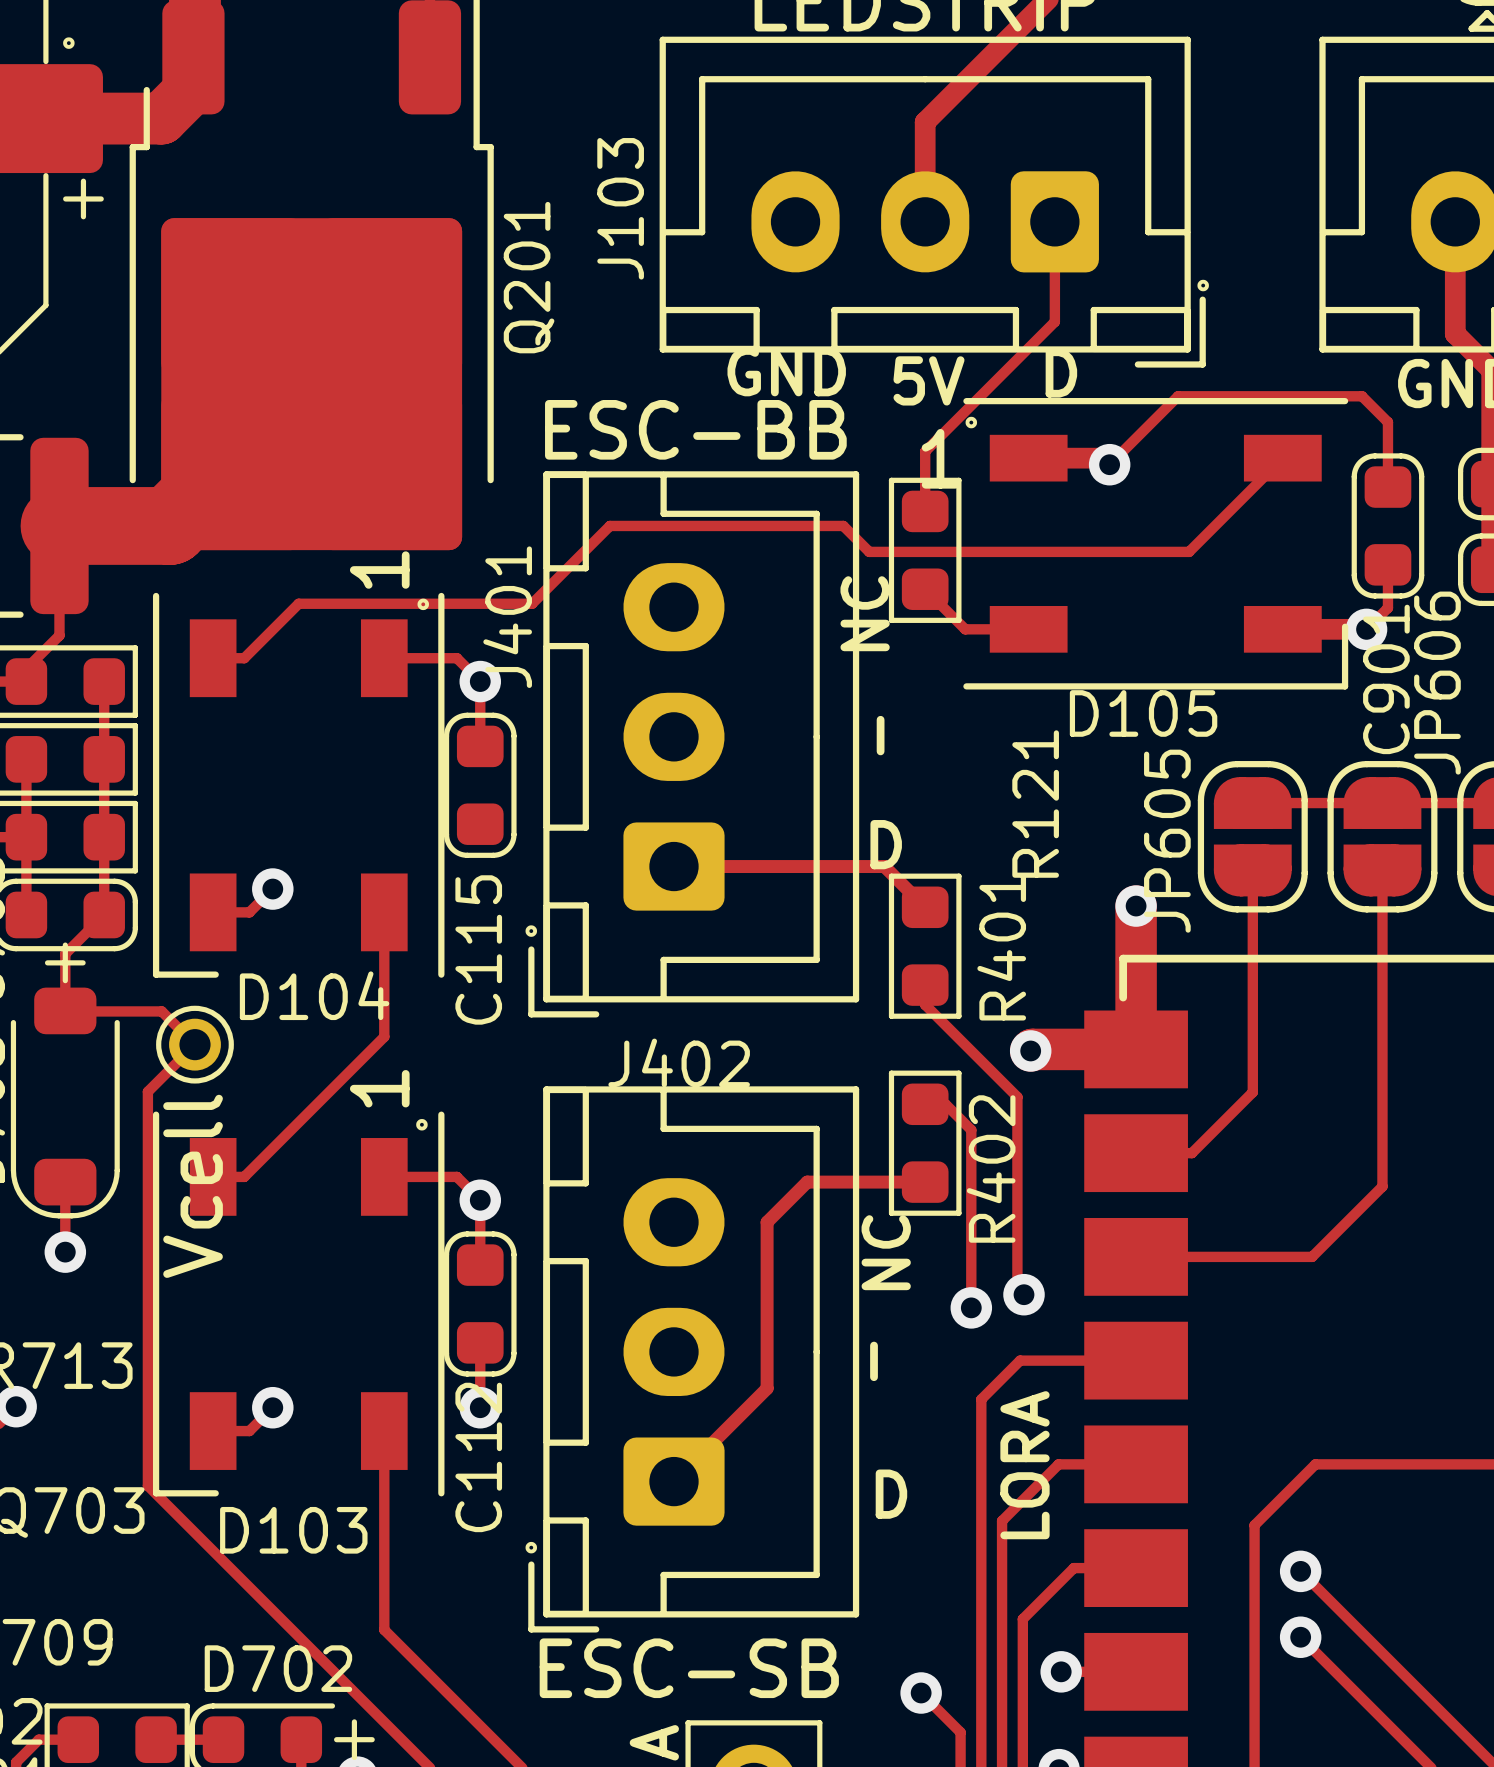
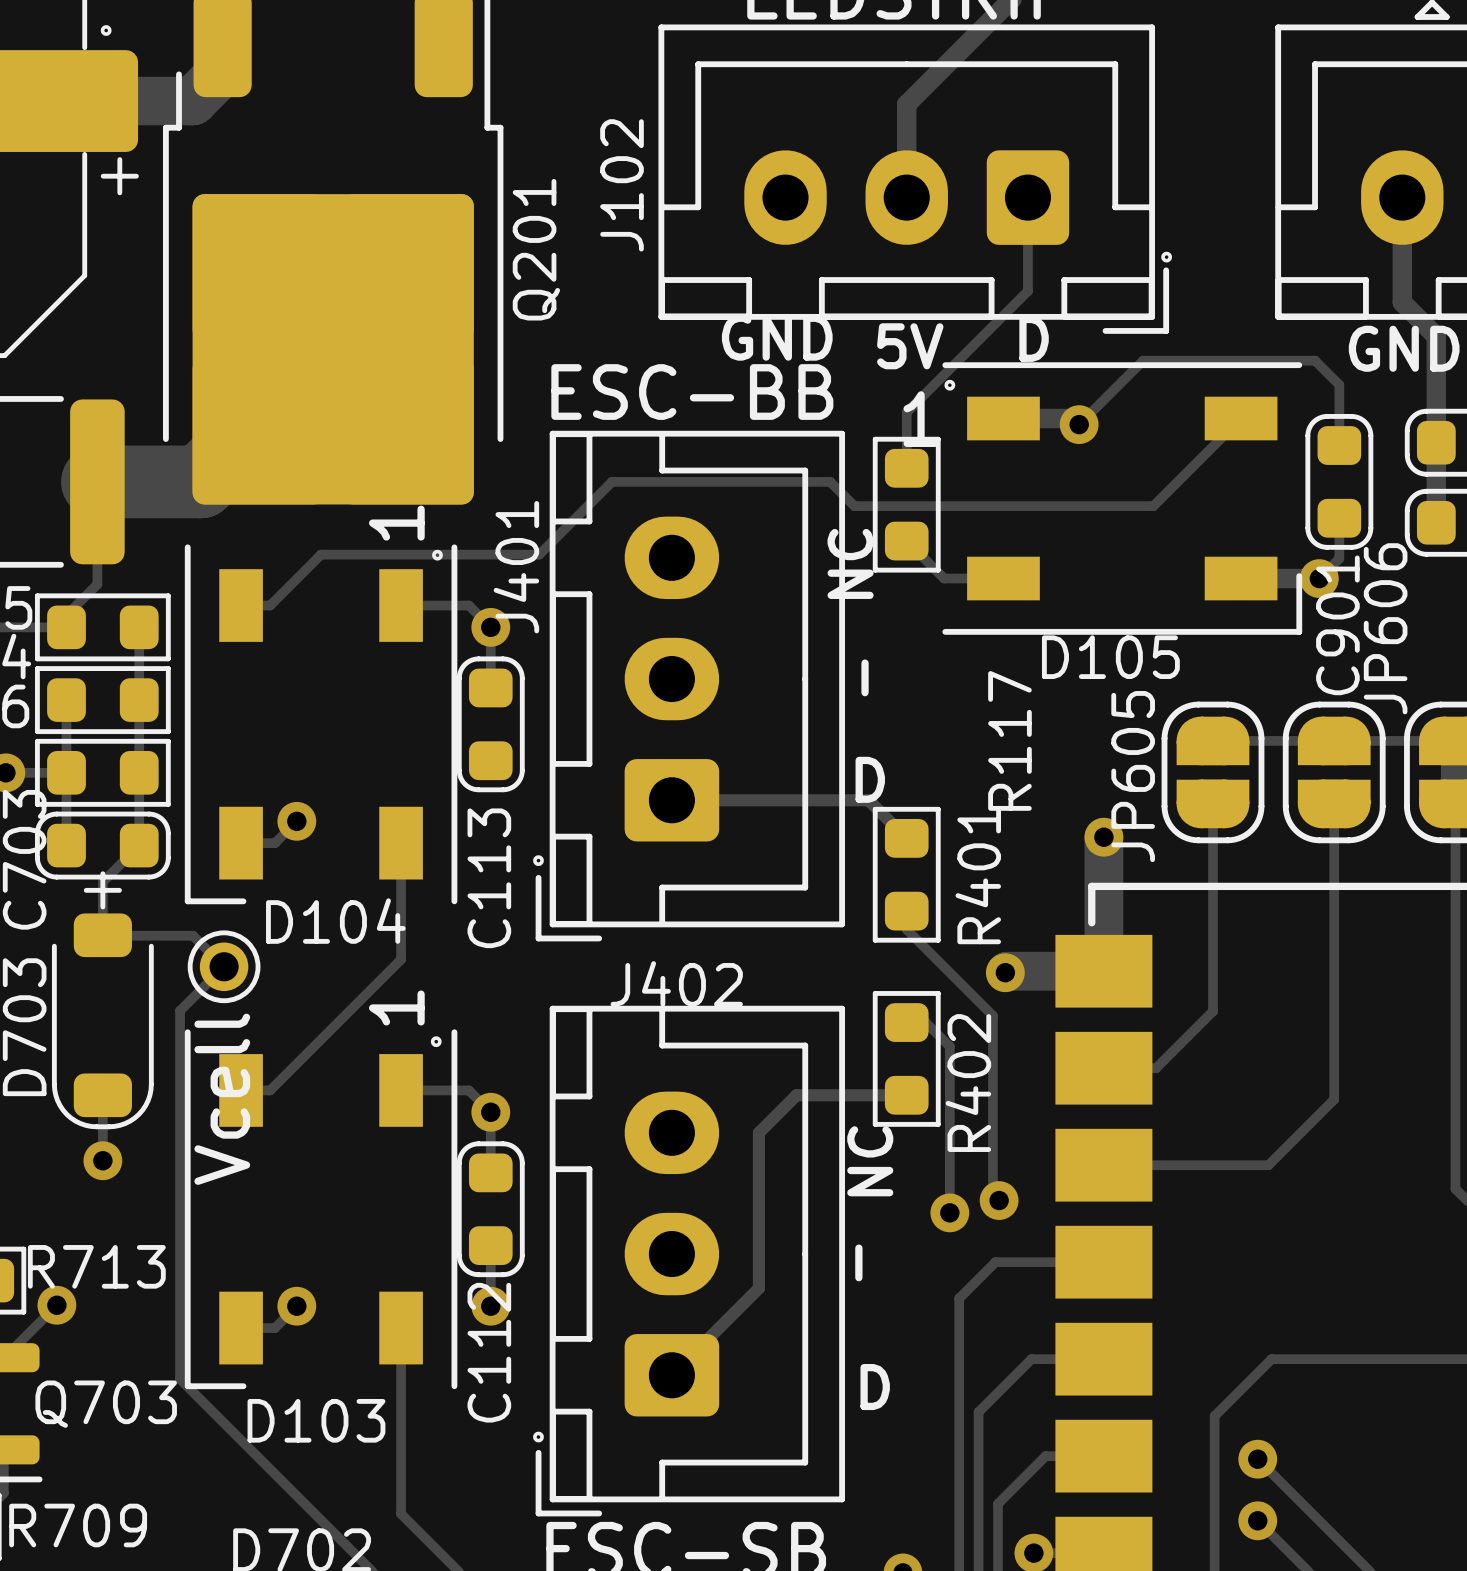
J103 name: J103 (620, 208) -> J102 (622, 185)
R121 name: R121 (1035, 804) -> R117 (1009, 740)
C115 name: C115 (478, 949) -> C113 (489, 878)
text: LORA (1024, 1465) -> none

